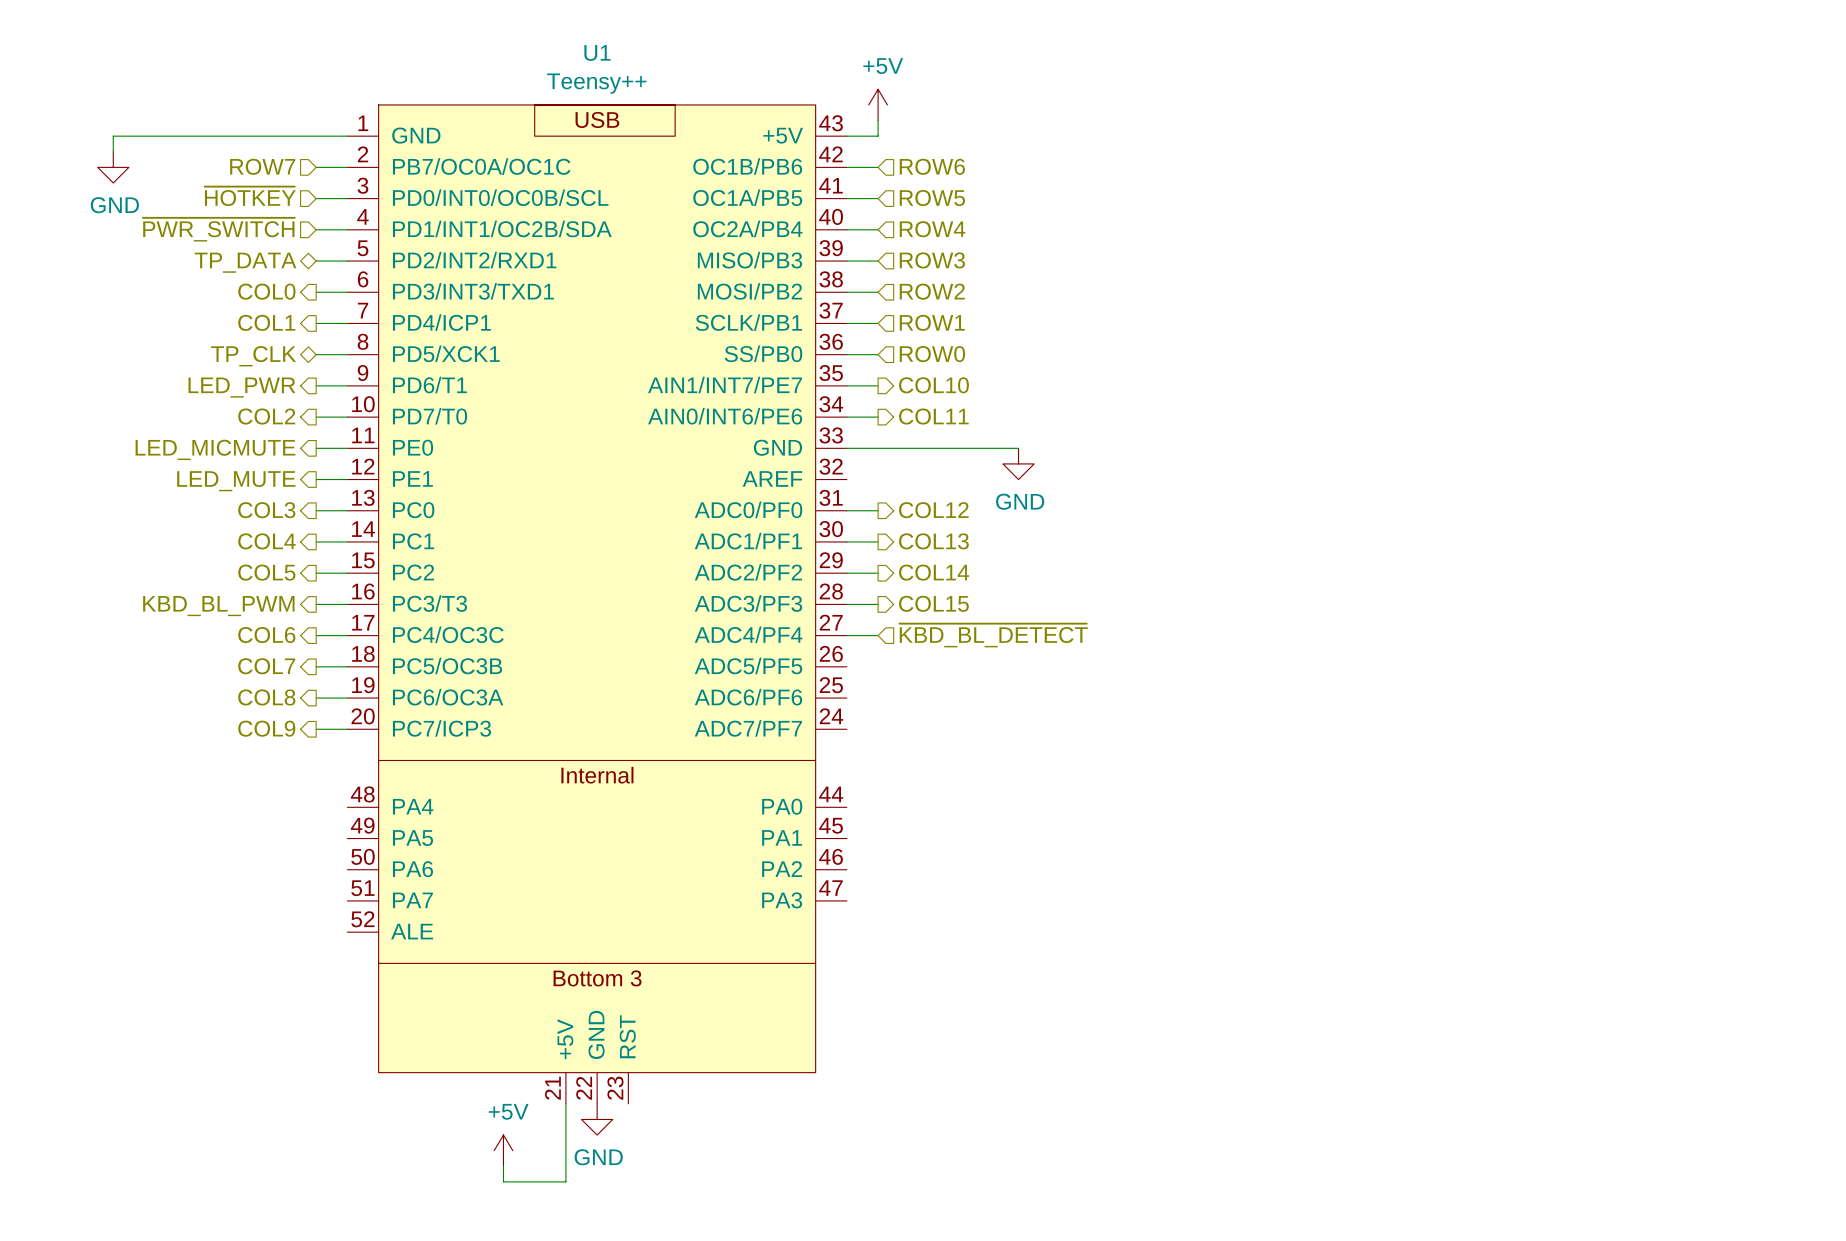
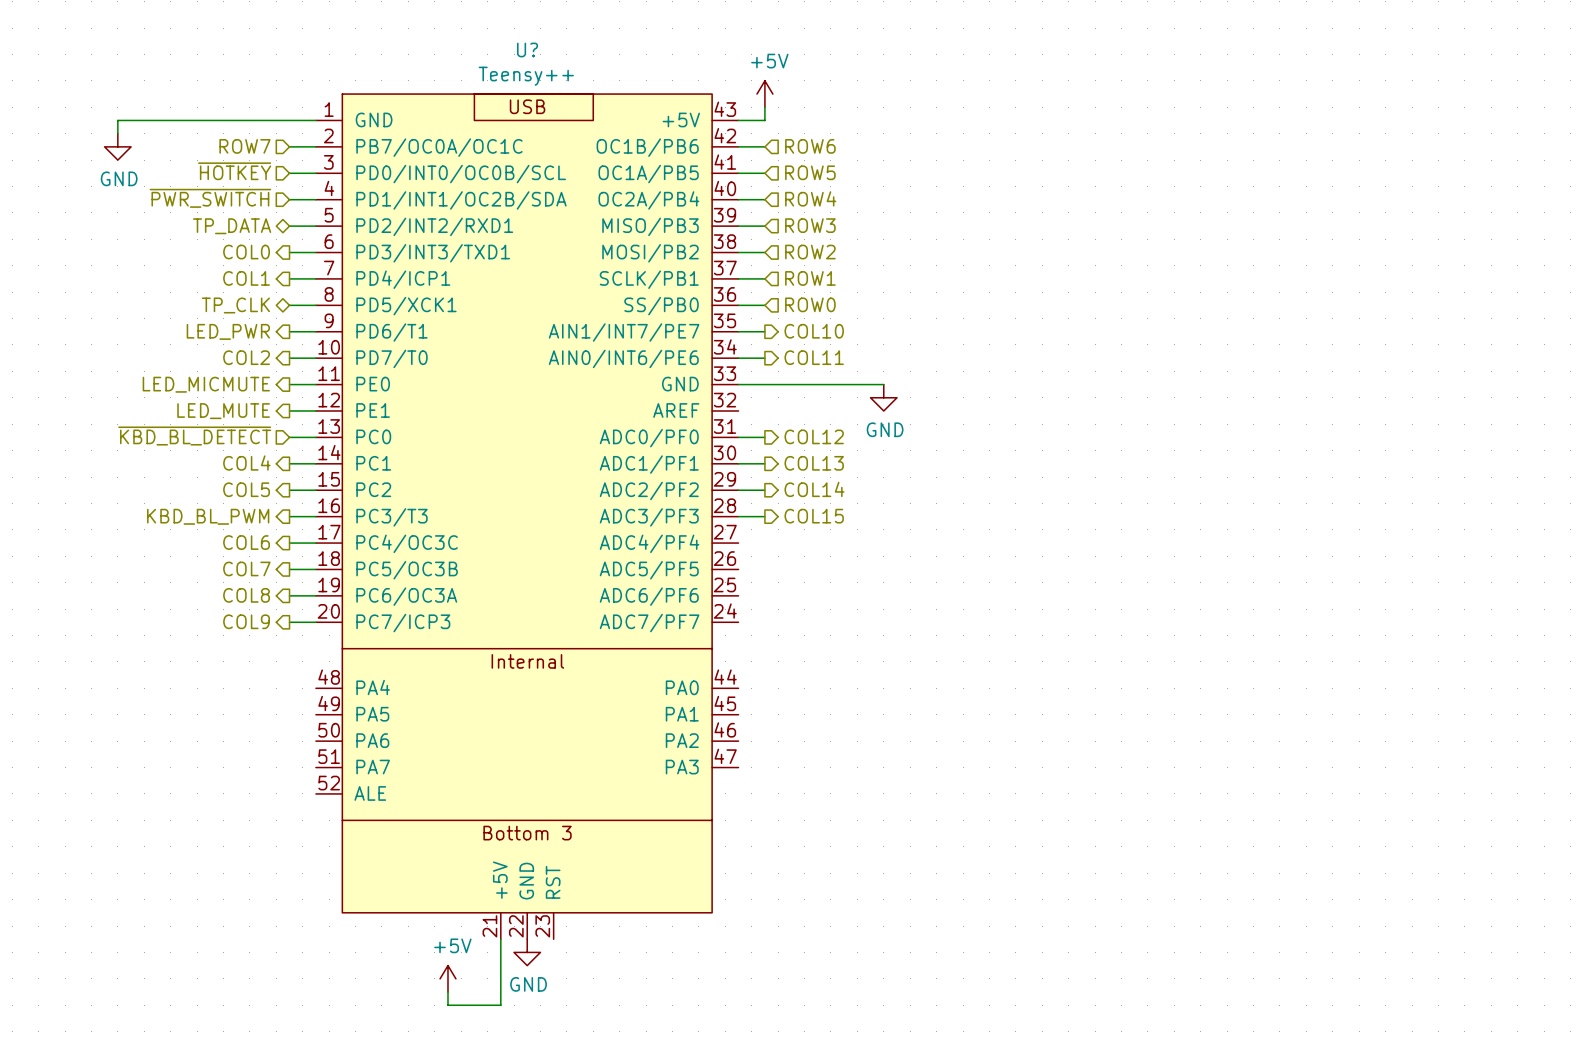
U1 name: U1 (597, 52) -> U? (527, 49)
hierarchical label shape: output (266, 510) -> input (194, 436)
hierarchical label: COL3 (266, 510) -> ~{KBD_BL_DETECT} (194, 436)
wire: (846, 635) (878, 635) -> none
hierarchical label: ~{KBD_BL_DETECT} (993, 635) -> none

